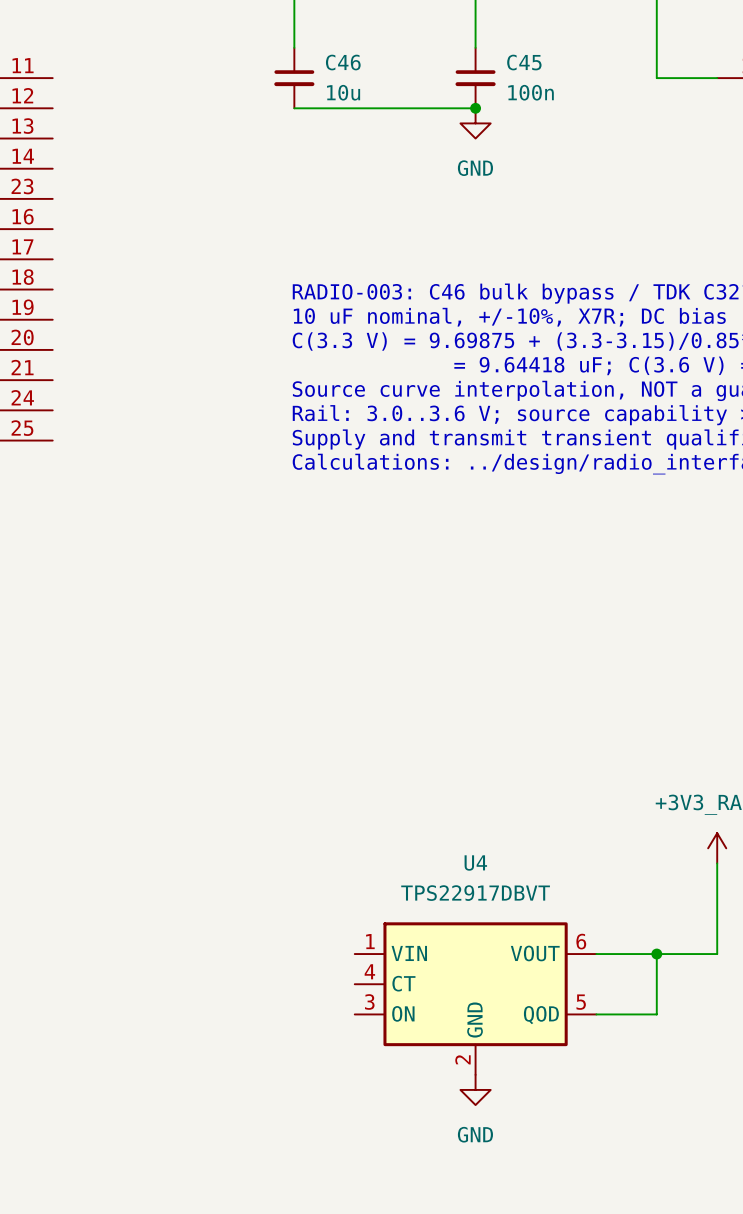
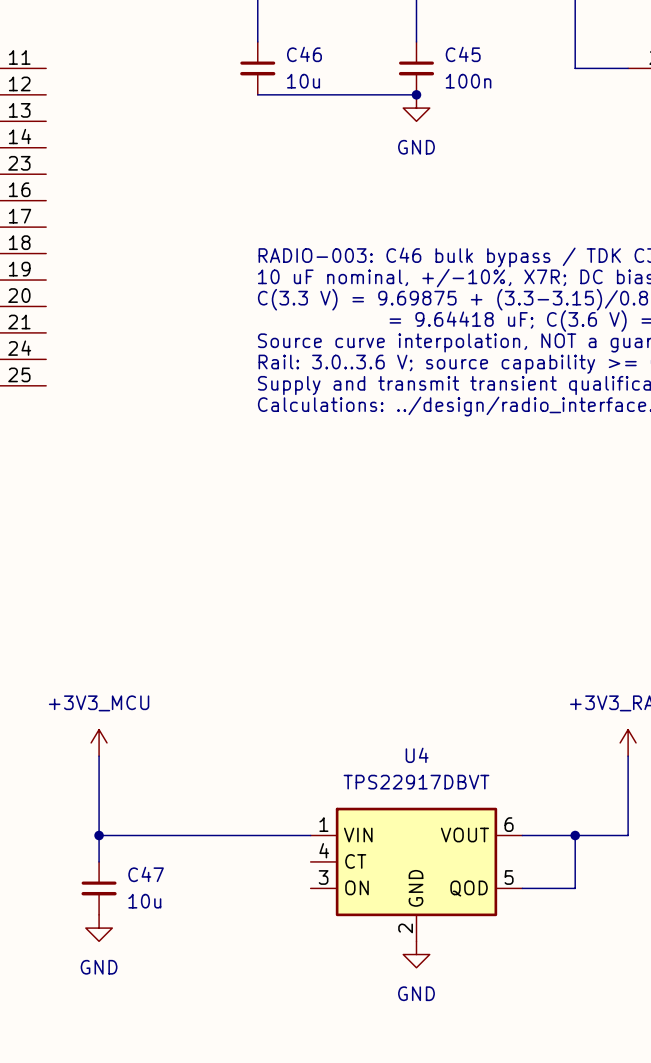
power symbol: none -> +3V3_MCU (99, 742)
wire: none -> (99, 756) (99, 861)
wire: none -> (99, 835) (310, 835)
junction: none -> (99, 835)
C47: none -> 10u (99, 888)
power symbol: none -> GND (99, 928)

